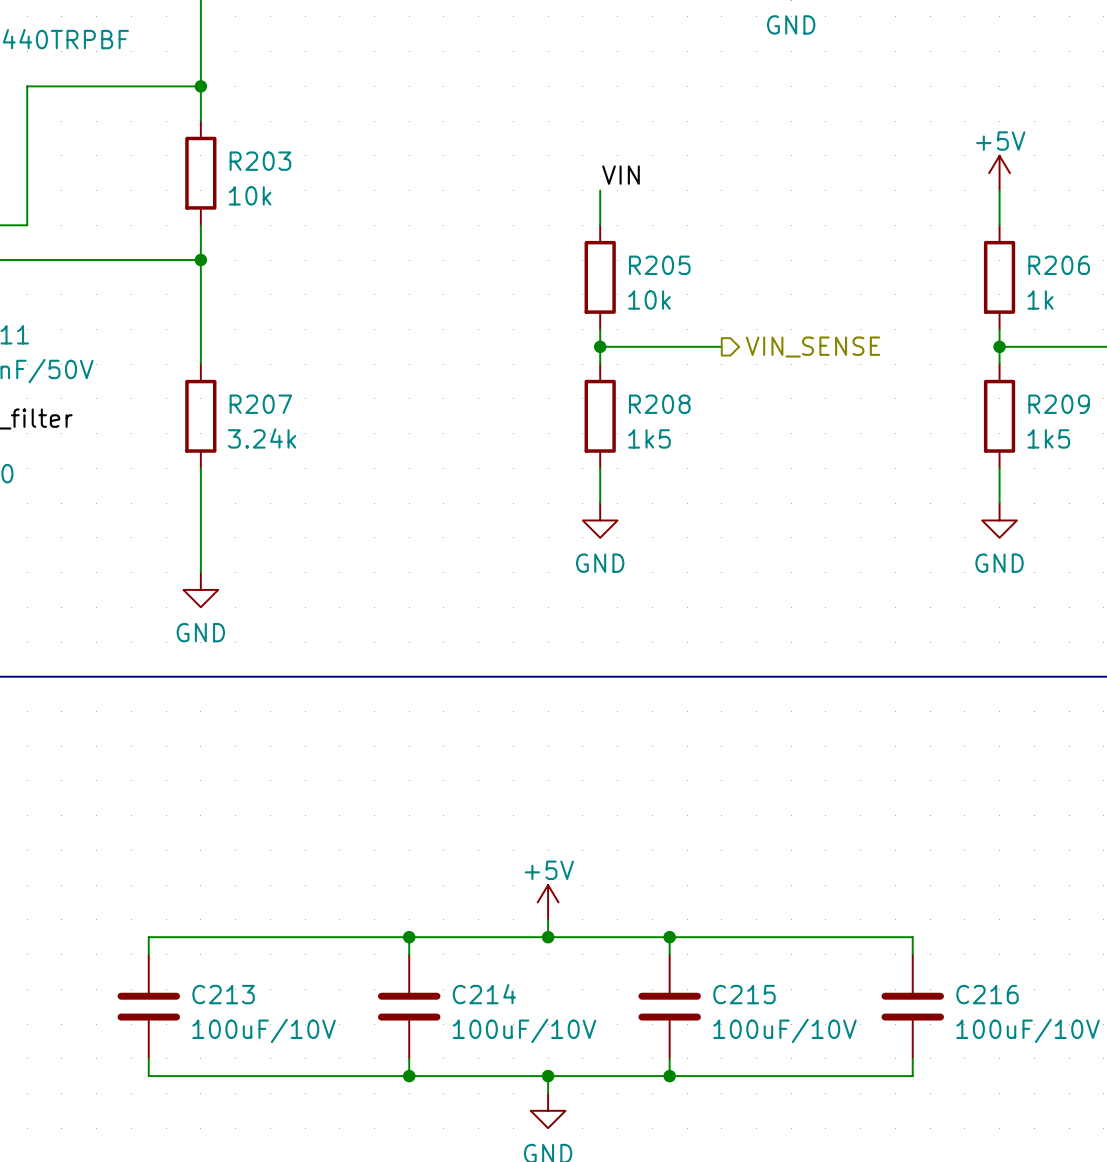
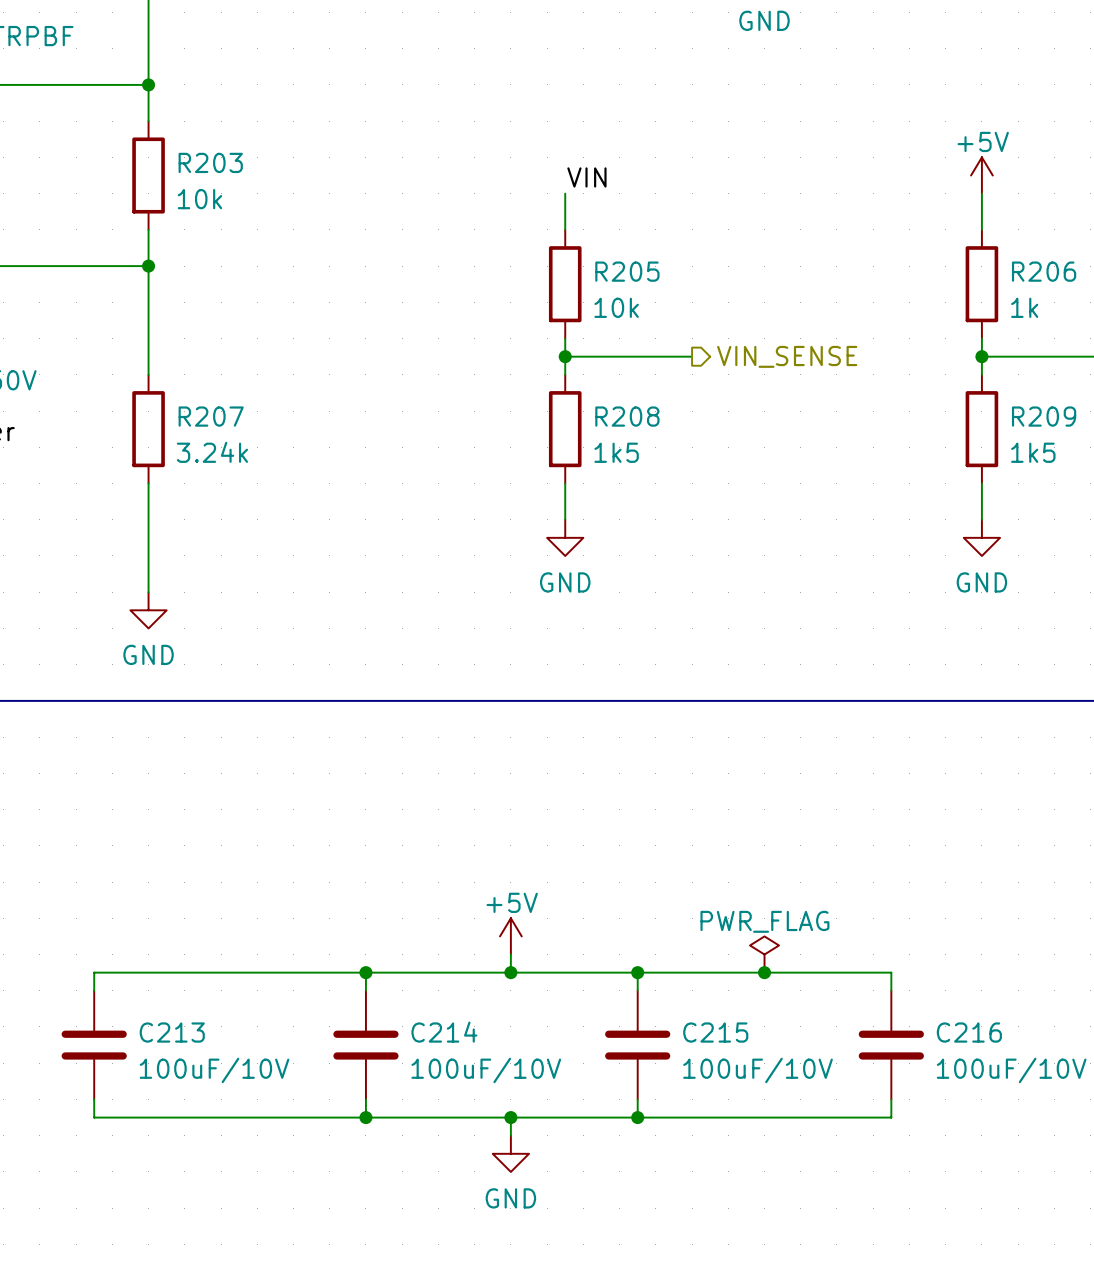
power symbol: none -> PWR_FLAG (764, 954)
junction: none -> (764, 972)

